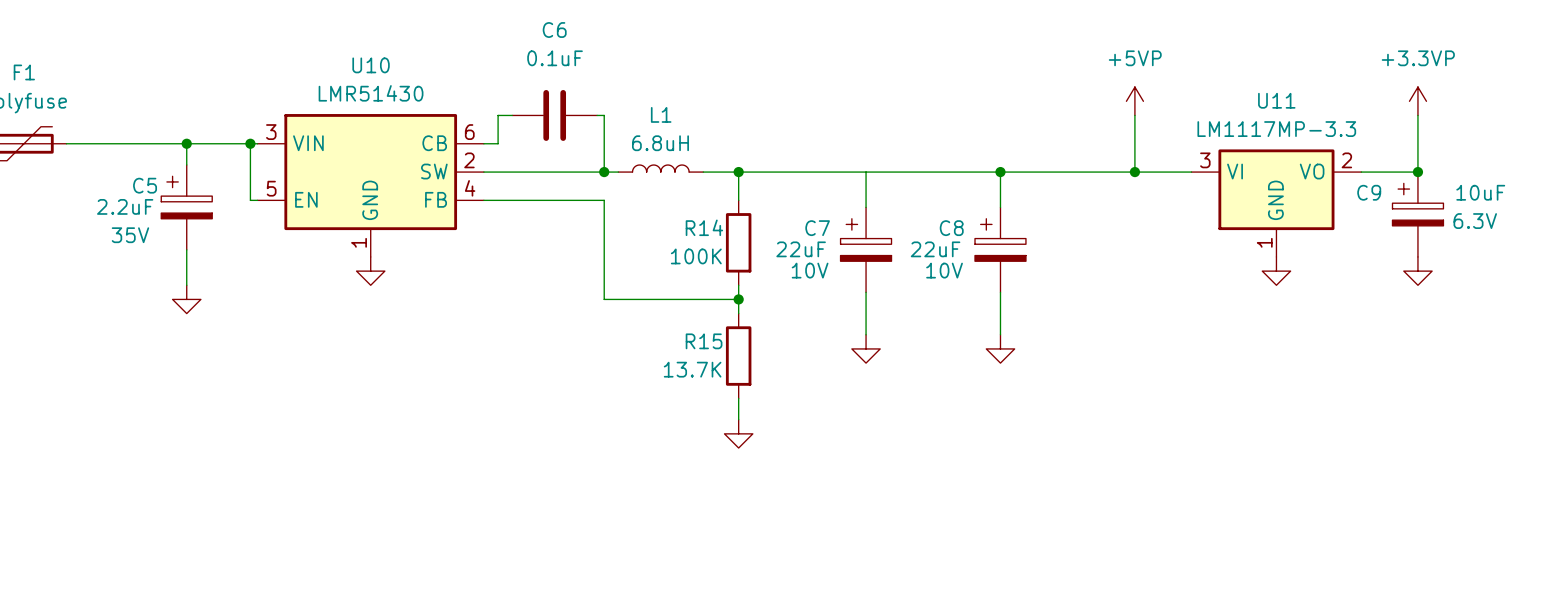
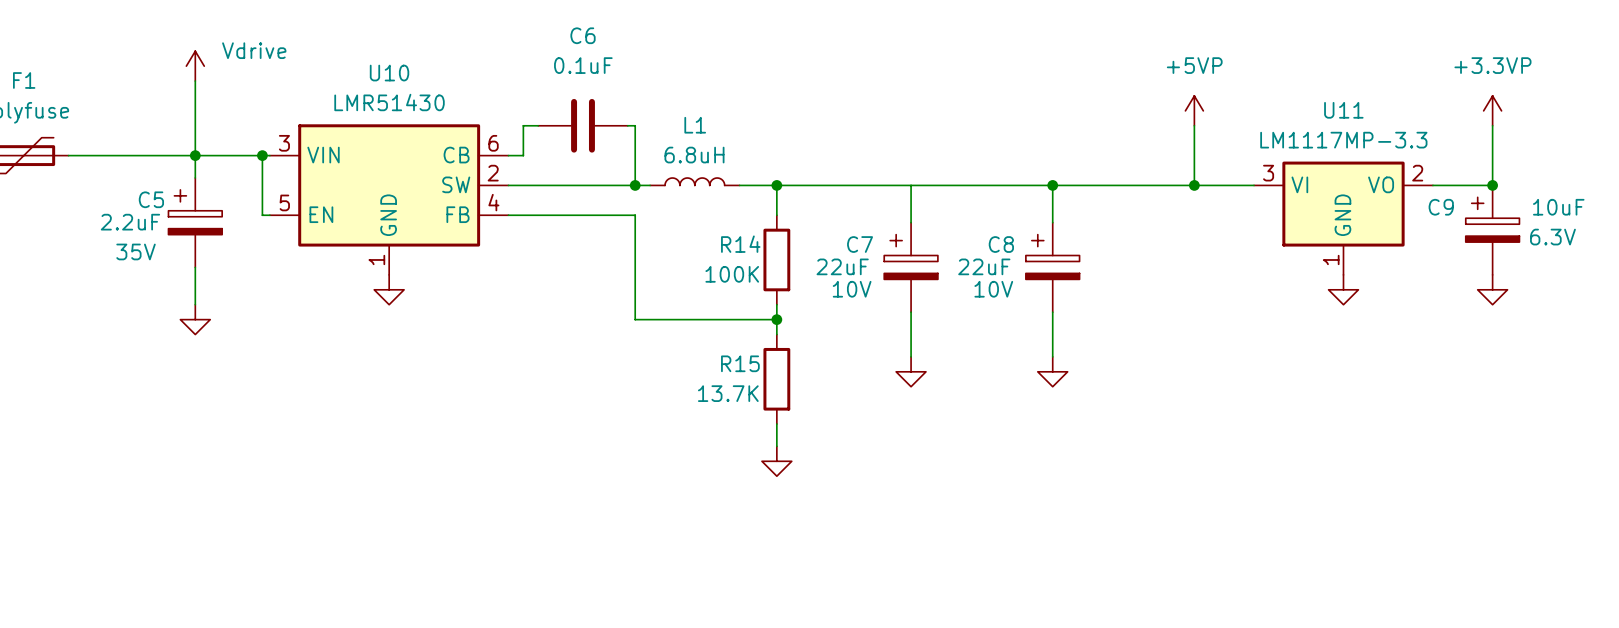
power symbol: none -> Vdrive (195, 66)
wire: none -> (195, 81) (195, 155)

